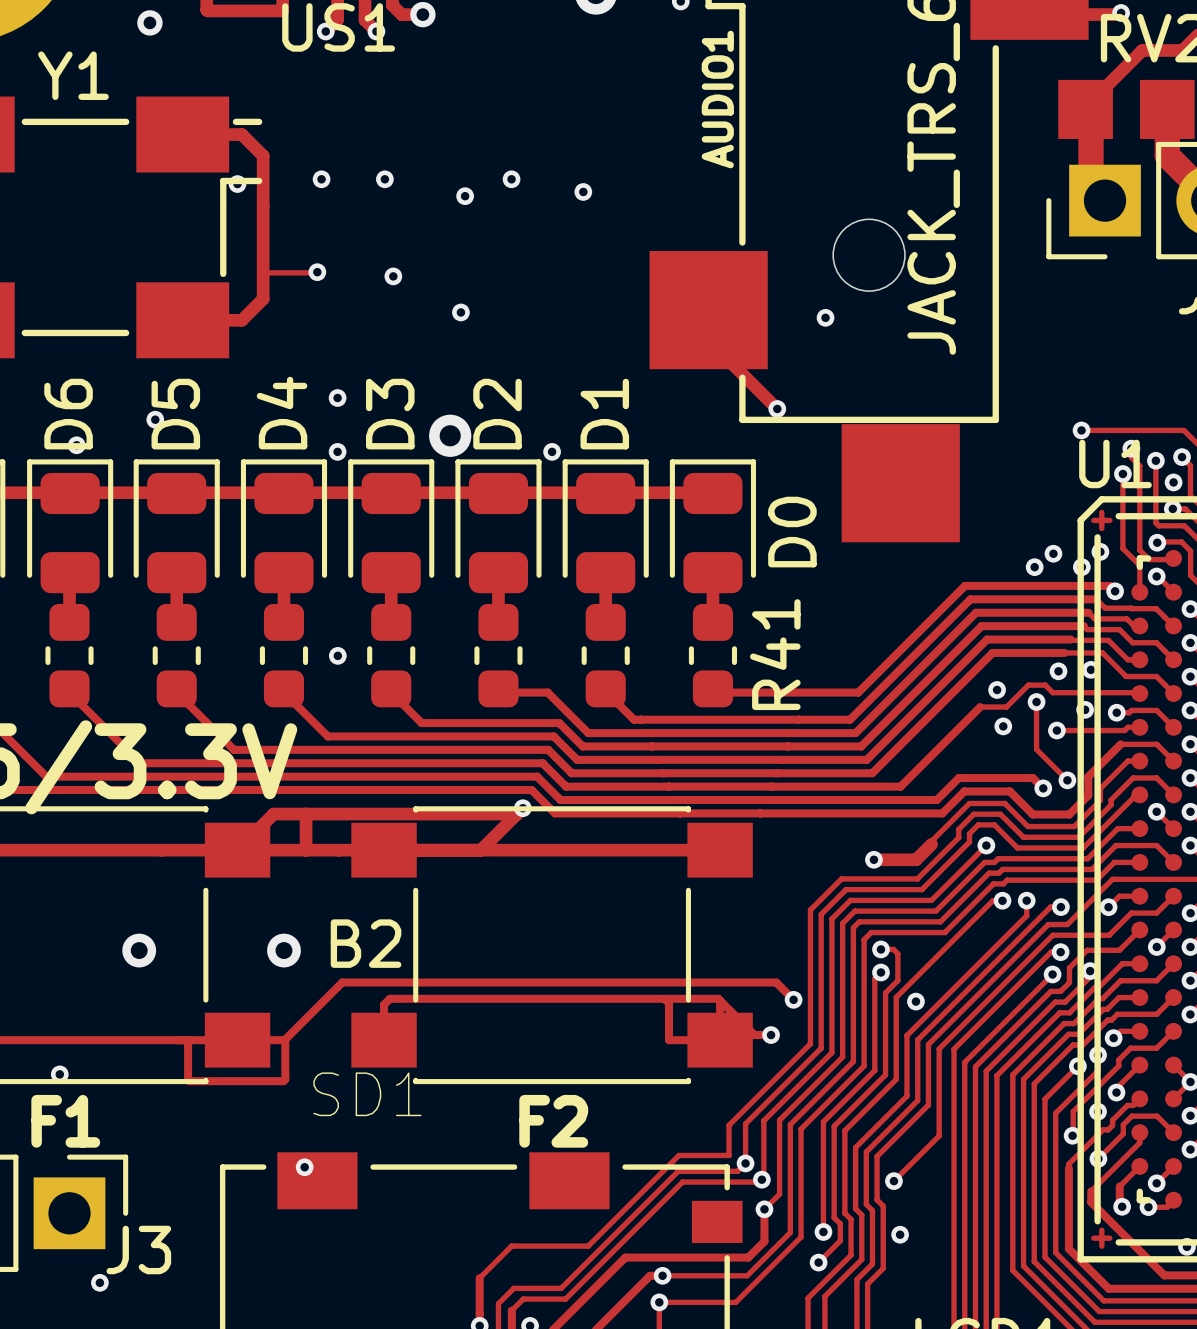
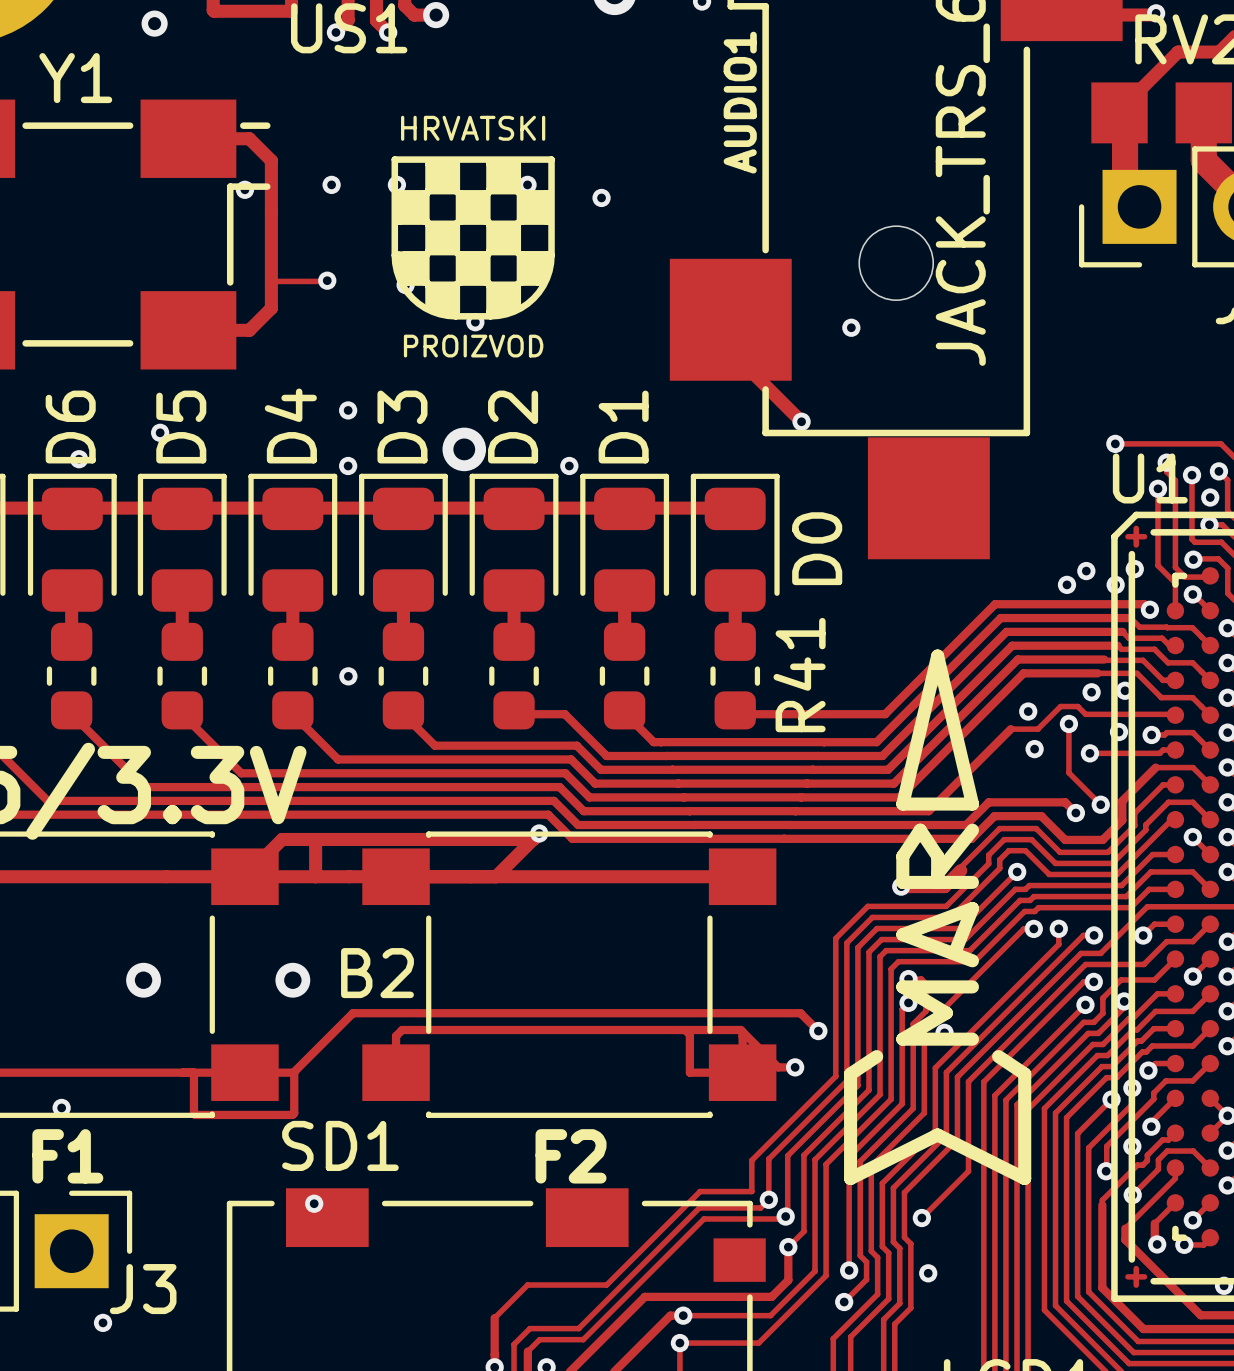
drawing: none -> [391, 156, 555, 320]
drawing: none -> [844, 649, 1032, 1186]
SD1 name position: SD1 (367, 1094) -> SD1 (340, 1145)

